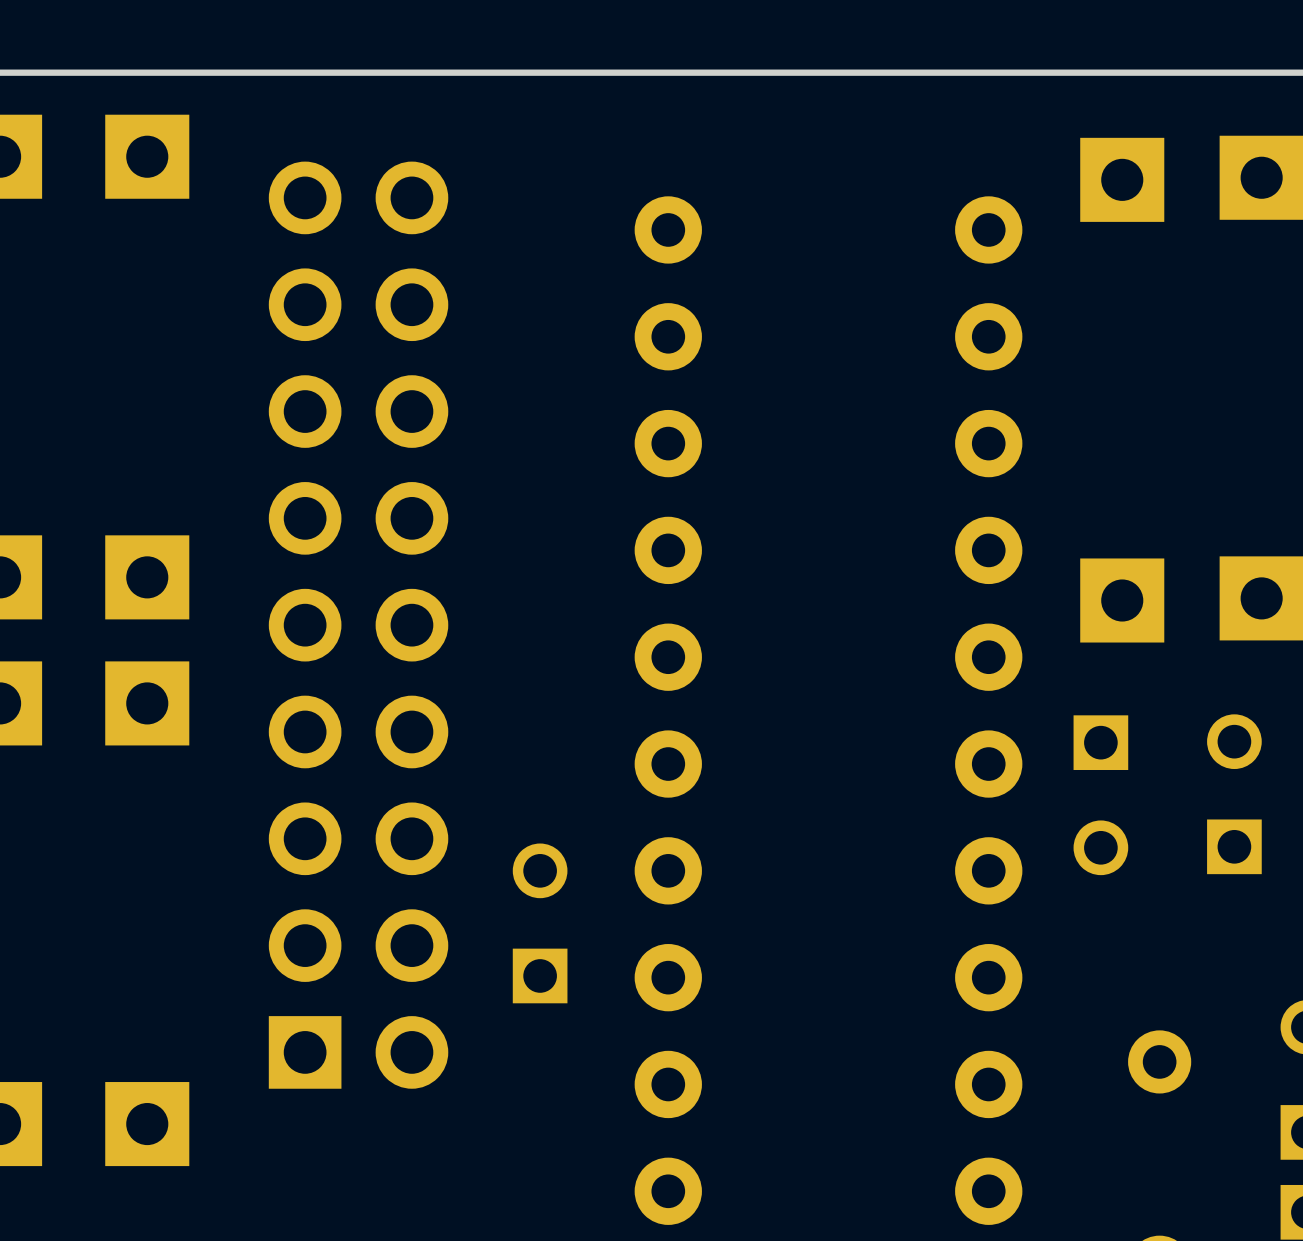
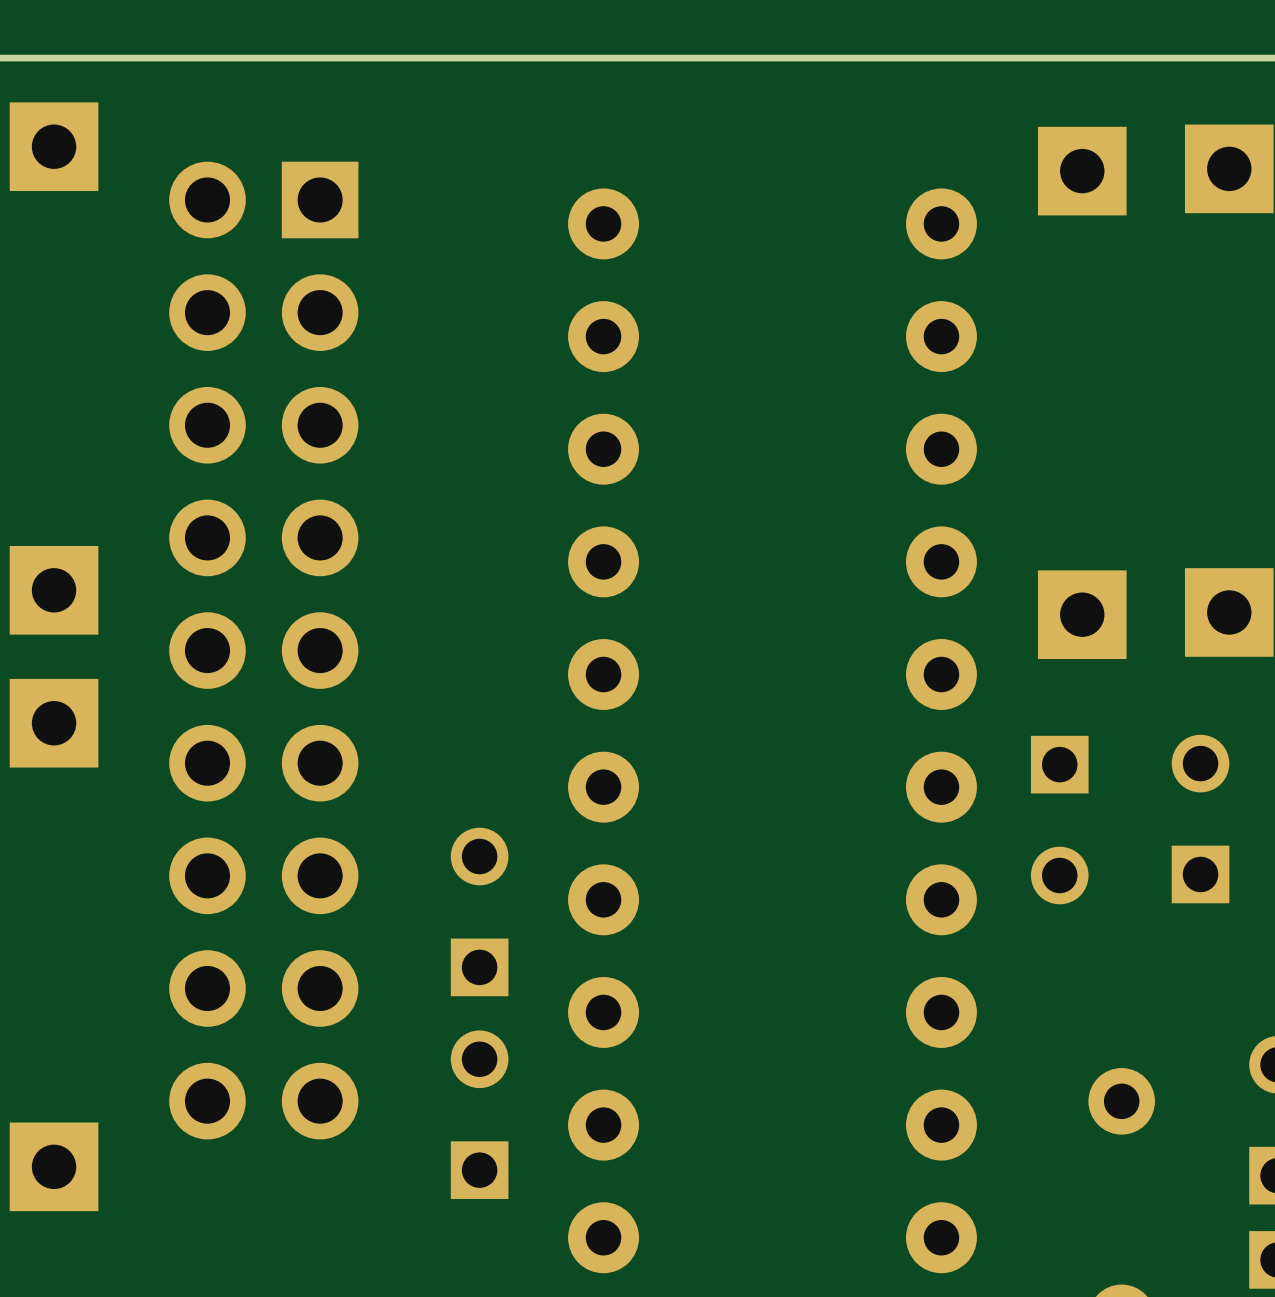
part rotation: 0° (358, 625) -> 180° (263, 650)
part position: (540, 923) -> (479, 911)
part: none -> (479, 1114)

